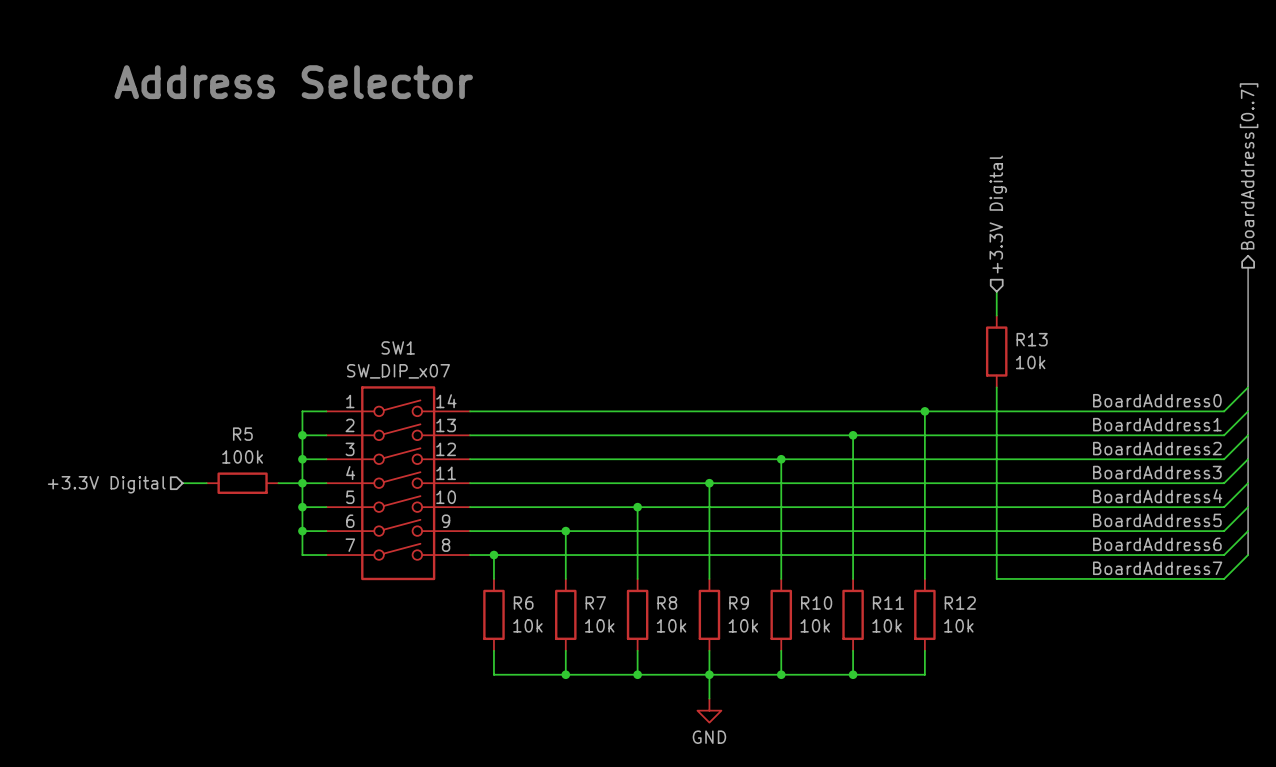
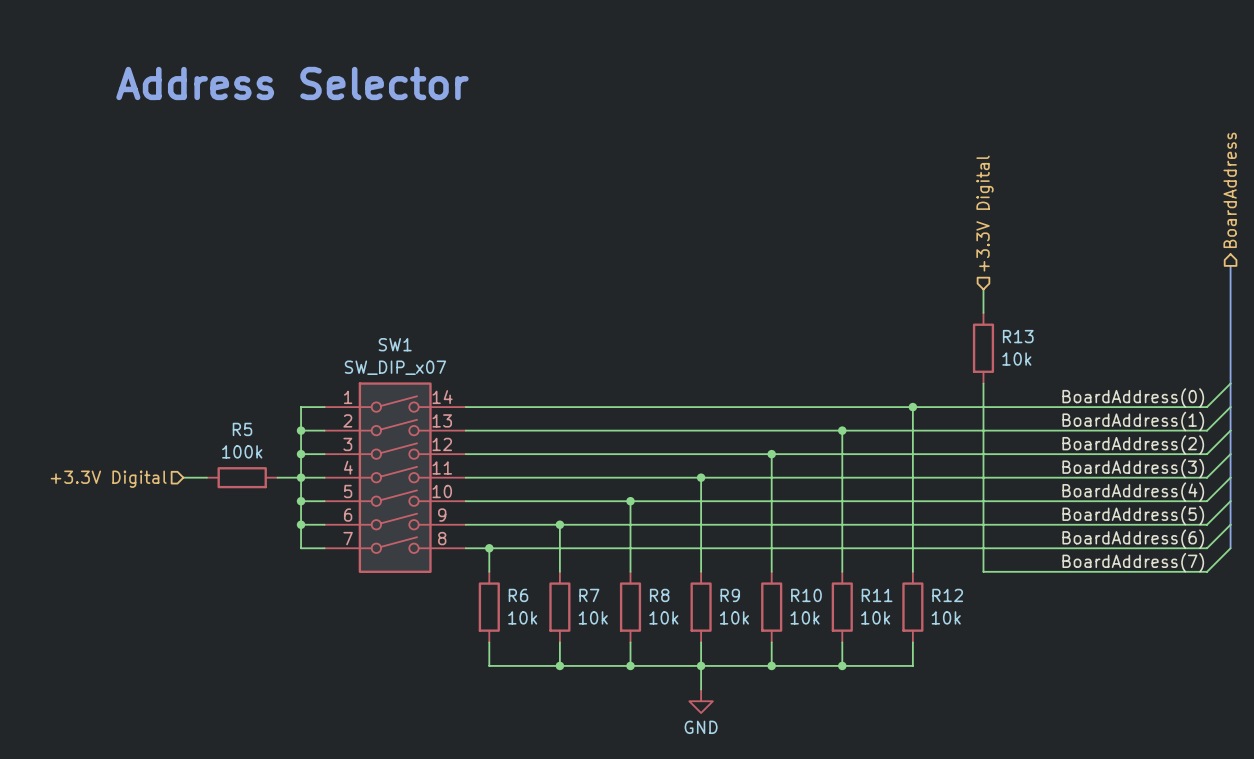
hierarchical label: BoardAddress[0..7] (1249, 166) -> BoardAddress (1230, 190)
label: BoardAddress0 (1157, 400) -> BoardAddress(0) (1133, 397)
label: BoardAddress1 (1157, 424) -> BoardAddress(1) (1133, 421)
label: BoardAddress2 (1157, 448) -> BoardAddress(2) (1133, 445)
label: BoardAddress3 (1157, 472) -> BoardAddress(3) (1133, 468)
label: BoardAddress4 (1157, 496) -> BoardAddress(4) (1133, 492)
label: BoardAddress5 (1157, 520) -> BoardAddress(5) (1133, 515)
label: BoardAddress6 (1157, 544) -> BoardAddress(6) (1133, 539)
label: BoardAddress7 (1157, 568) -> BoardAddress(7) (1133, 562)

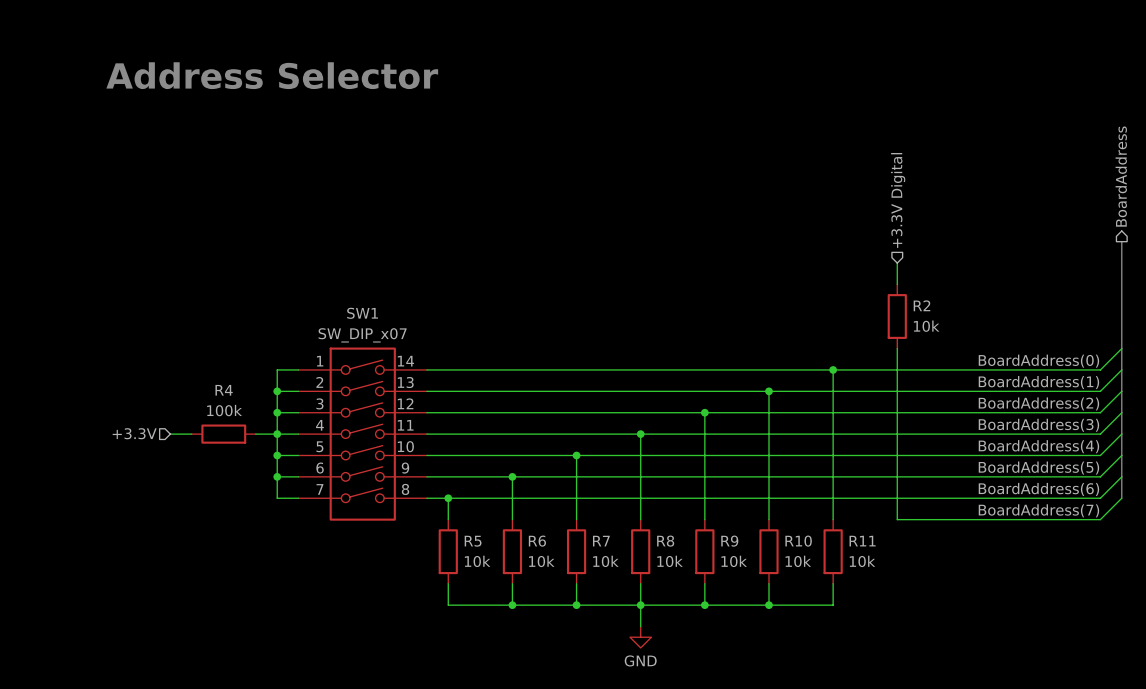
R13 name: R13 (1018, 336) -> R2 (921, 305)
R5 name: R5 (242, 429) -> R4 (224, 390)
hierarchical label: +3.3V Digital (108, 479) -> +3.3V (134, 433)
R6 name: R6 (518, 595) -> R5 (473, 541)
R7 name: R7 (589, 595) -> R6 (537, 541)
R8 name: R8 (659, 595) -> R7 (601, 541)
R9 name: R9 (730, 595) -> R8 (665, 541)
R10 name: R10 (806, 595) -> R9 (729, 541)
R11 name: R11 (877, 595) -> R10 (798, 541)
R12 name: R12 (947, 595) -> R11 (862, 541)

